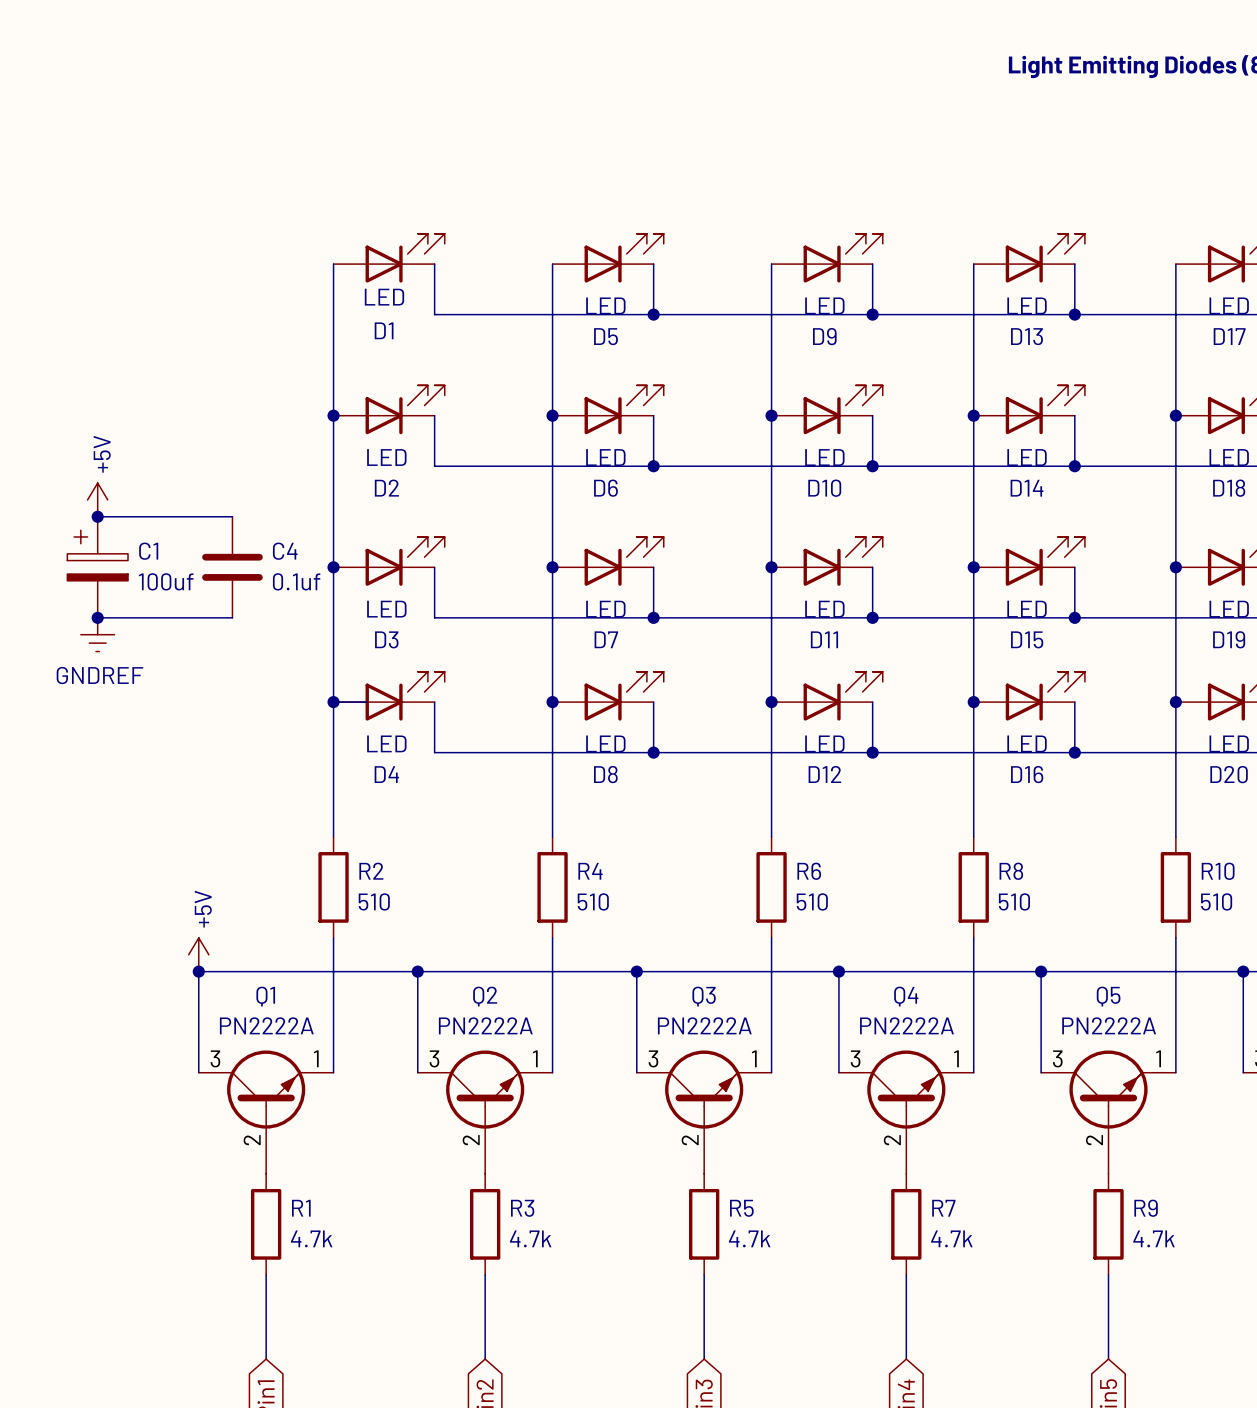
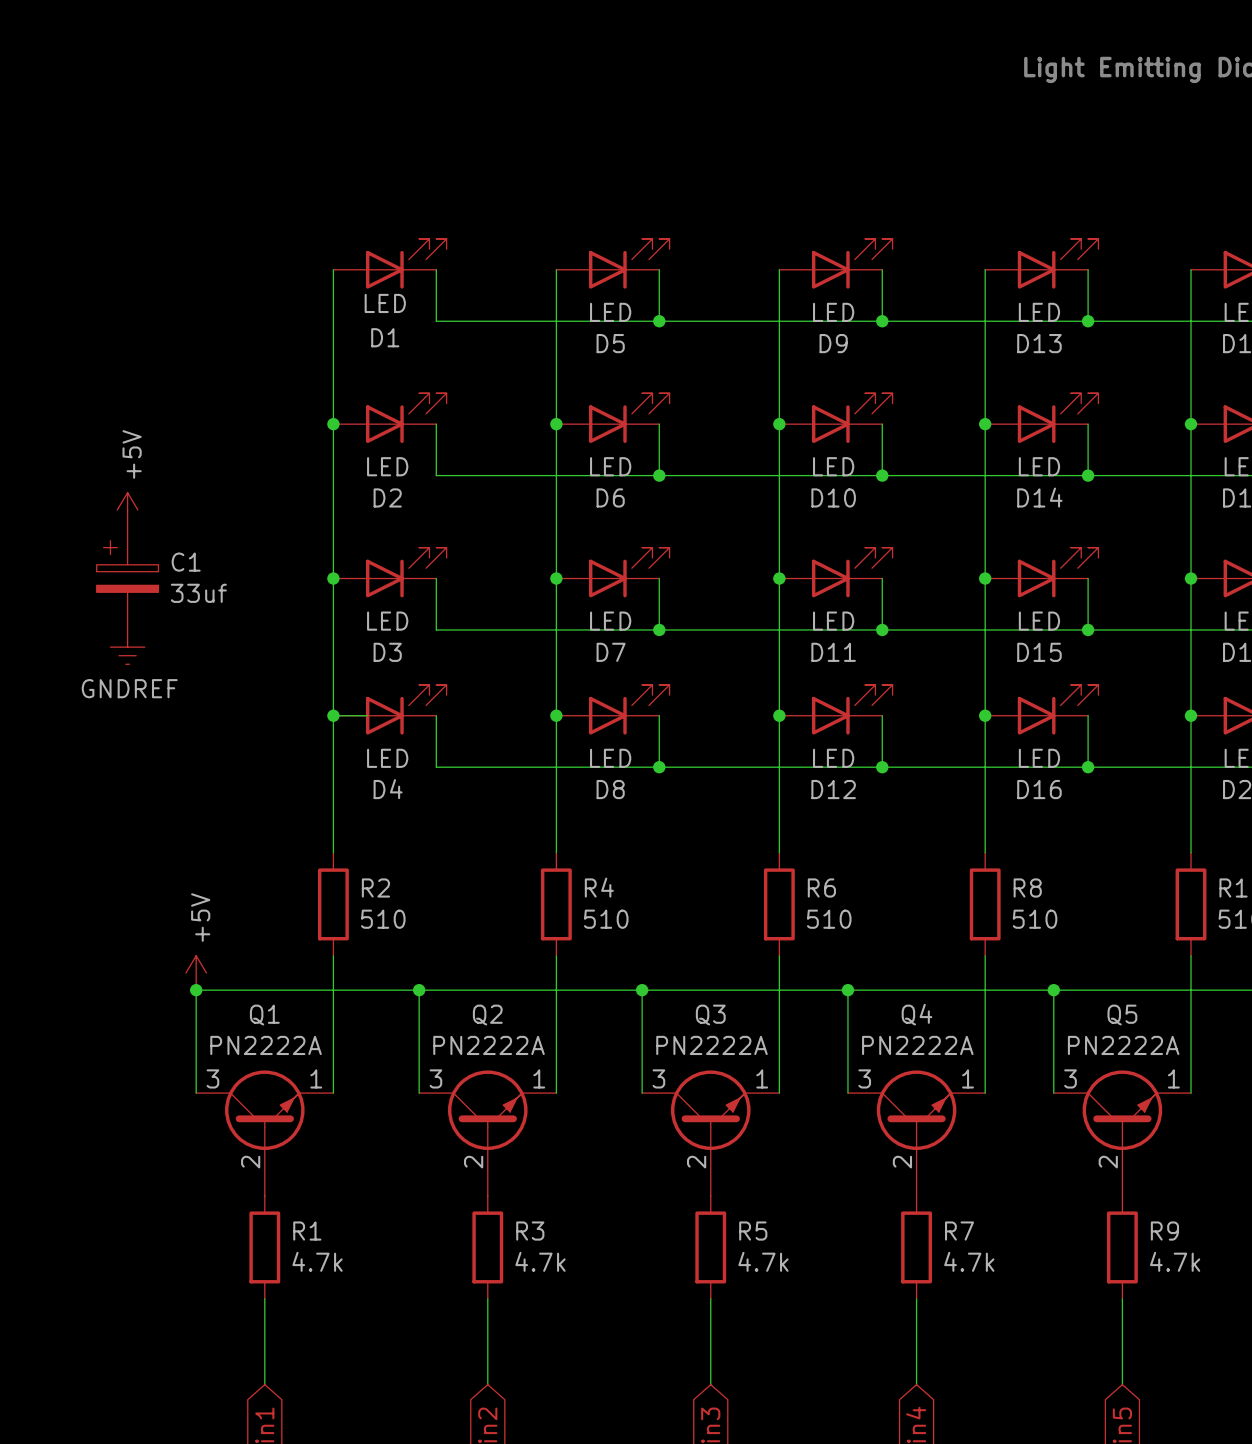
power symbol position: +5V (97, 499) -> +5V (127, 509)
wire: (97, 516) (232, 516) -> none
junction: (97, 516) -> none
C1 position: (97, 567) -> (127, 578)
C4: 0.1uf (232, 567) -> none
C1 value: 100uf (166, 581) -> 33uf (198, 593)
wire: (97, 617) (232, 617) -> none
junction: (97, 617) -> none
power symbol position: GNDREF (97, 634) -> GNDREF (127, 647)

